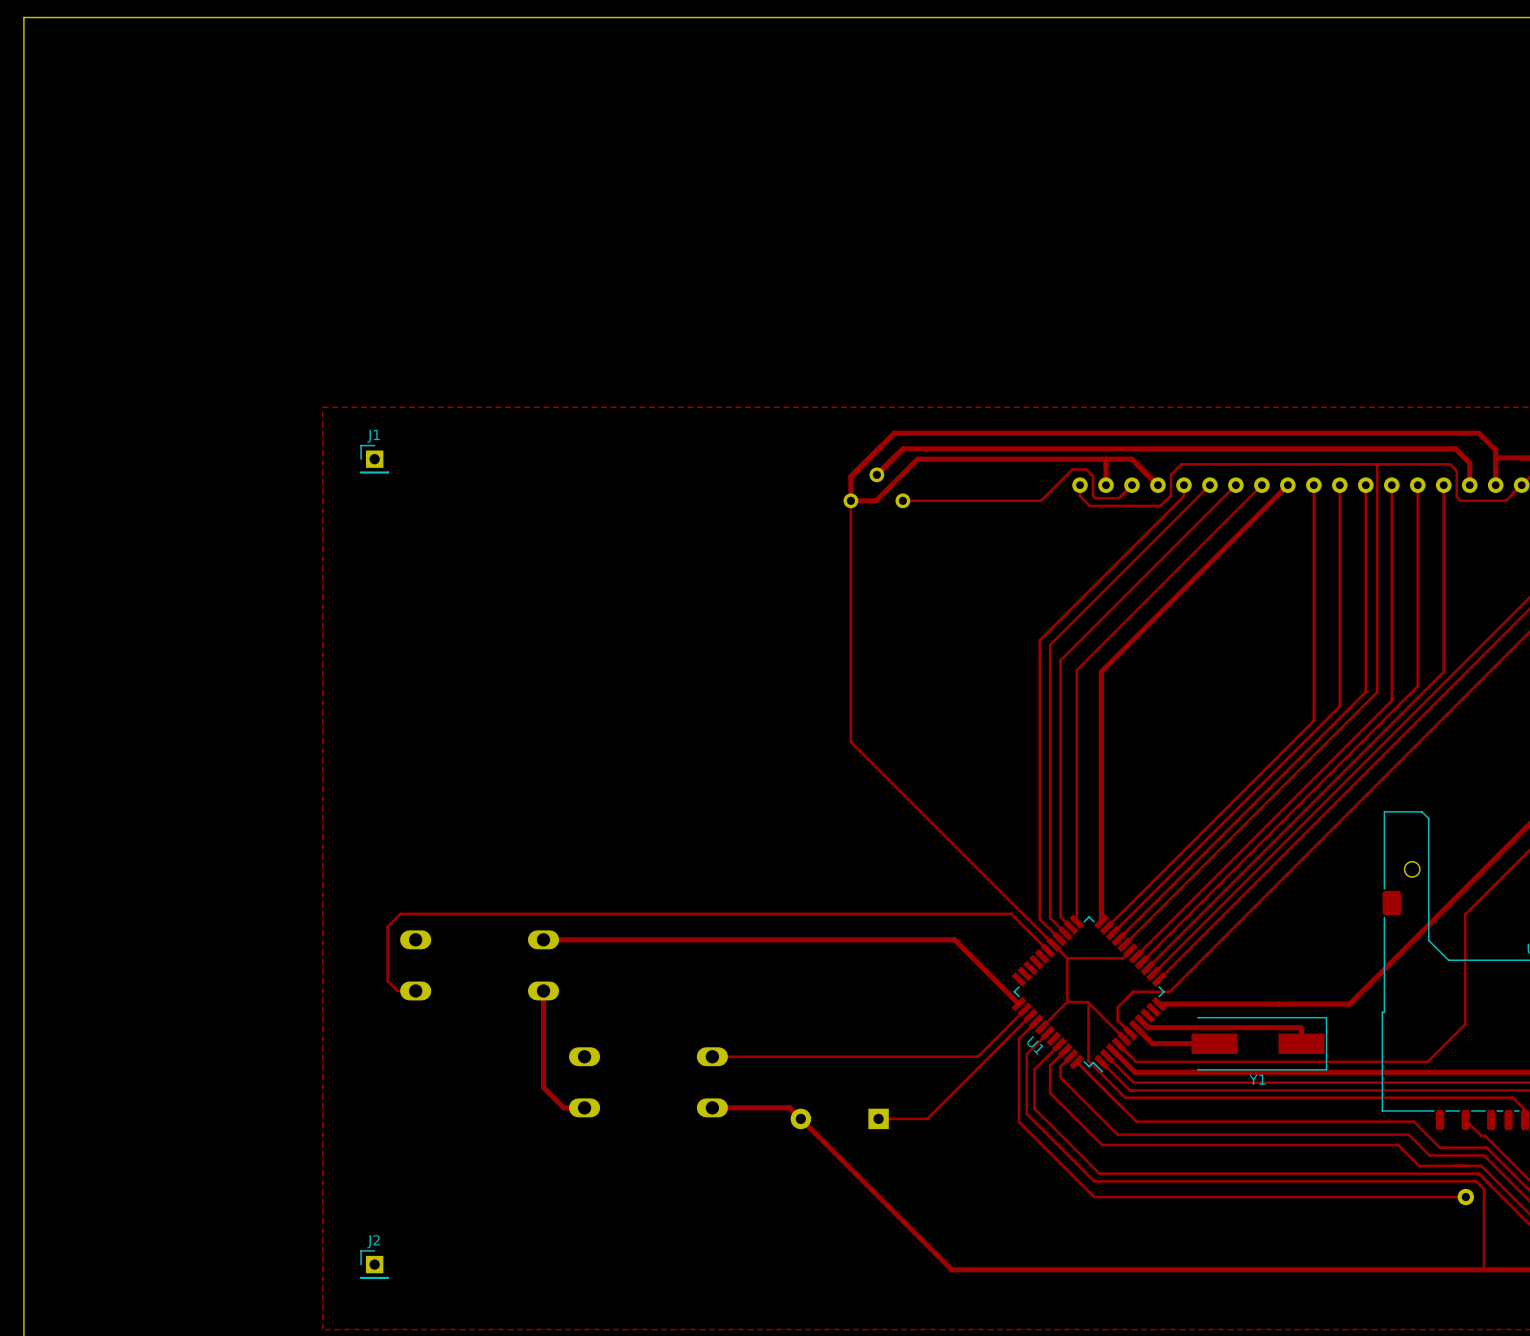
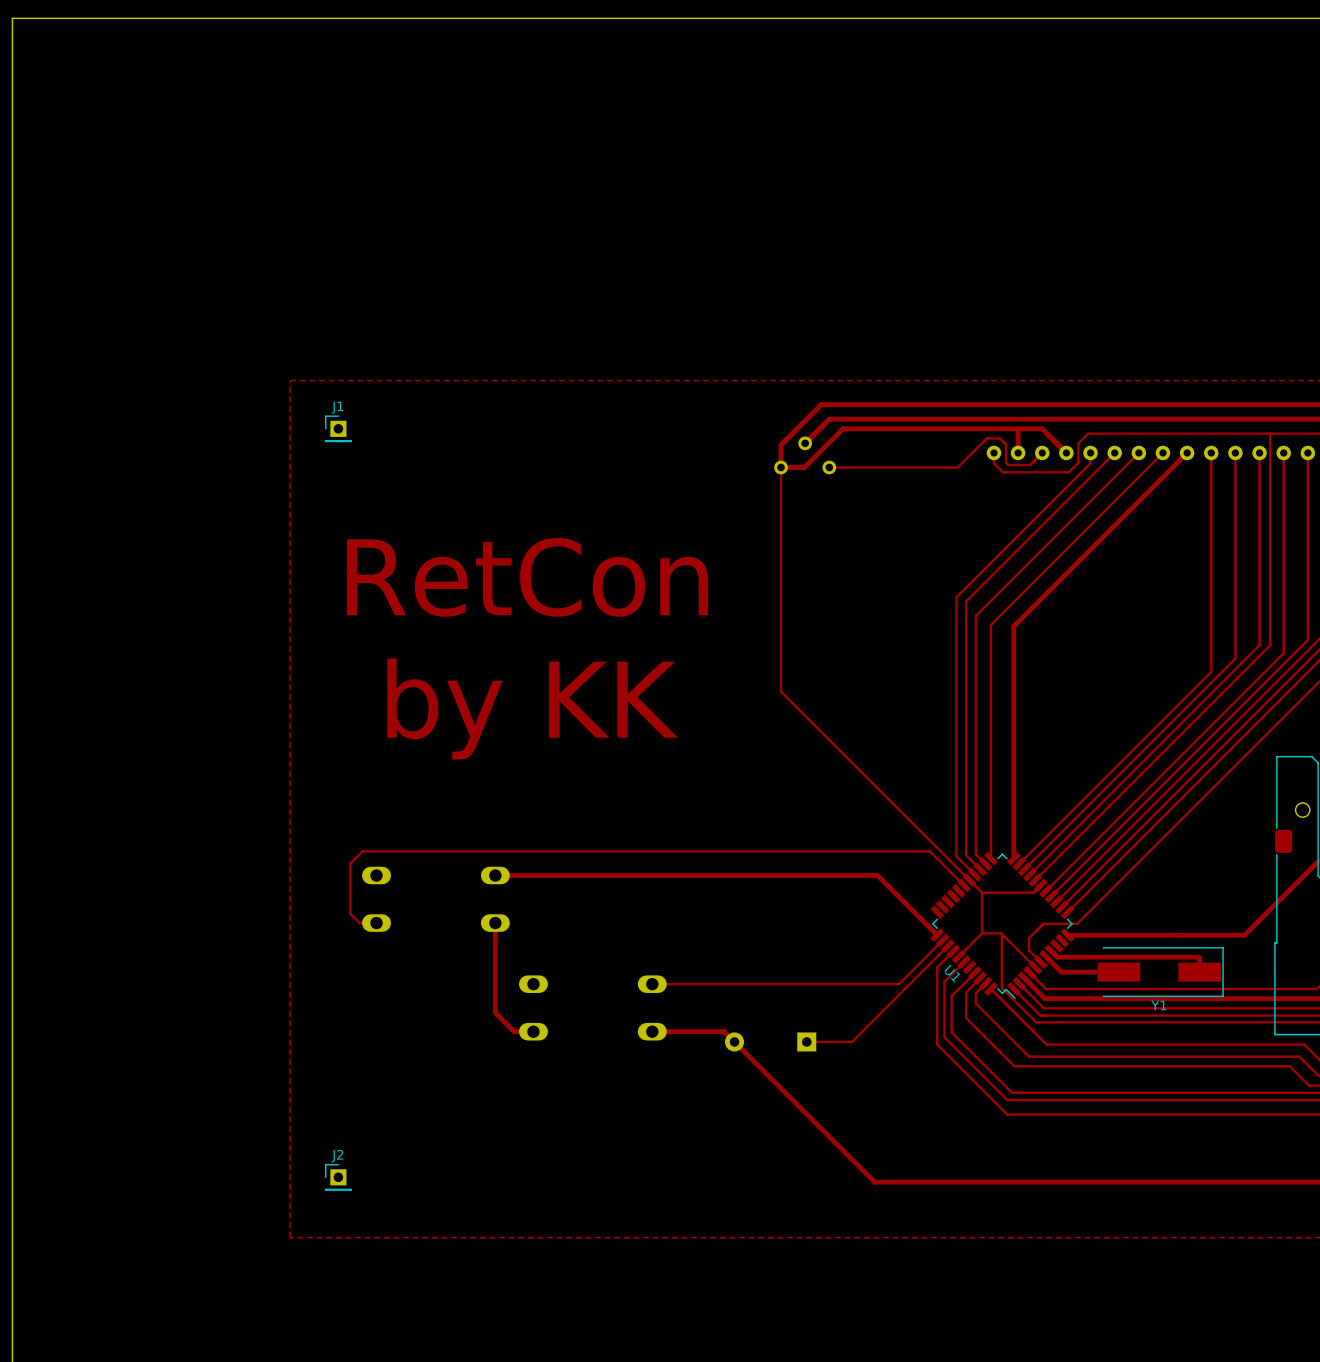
text: none -> RetCon (527, 577)
text: none -> by KK (532, 708)

